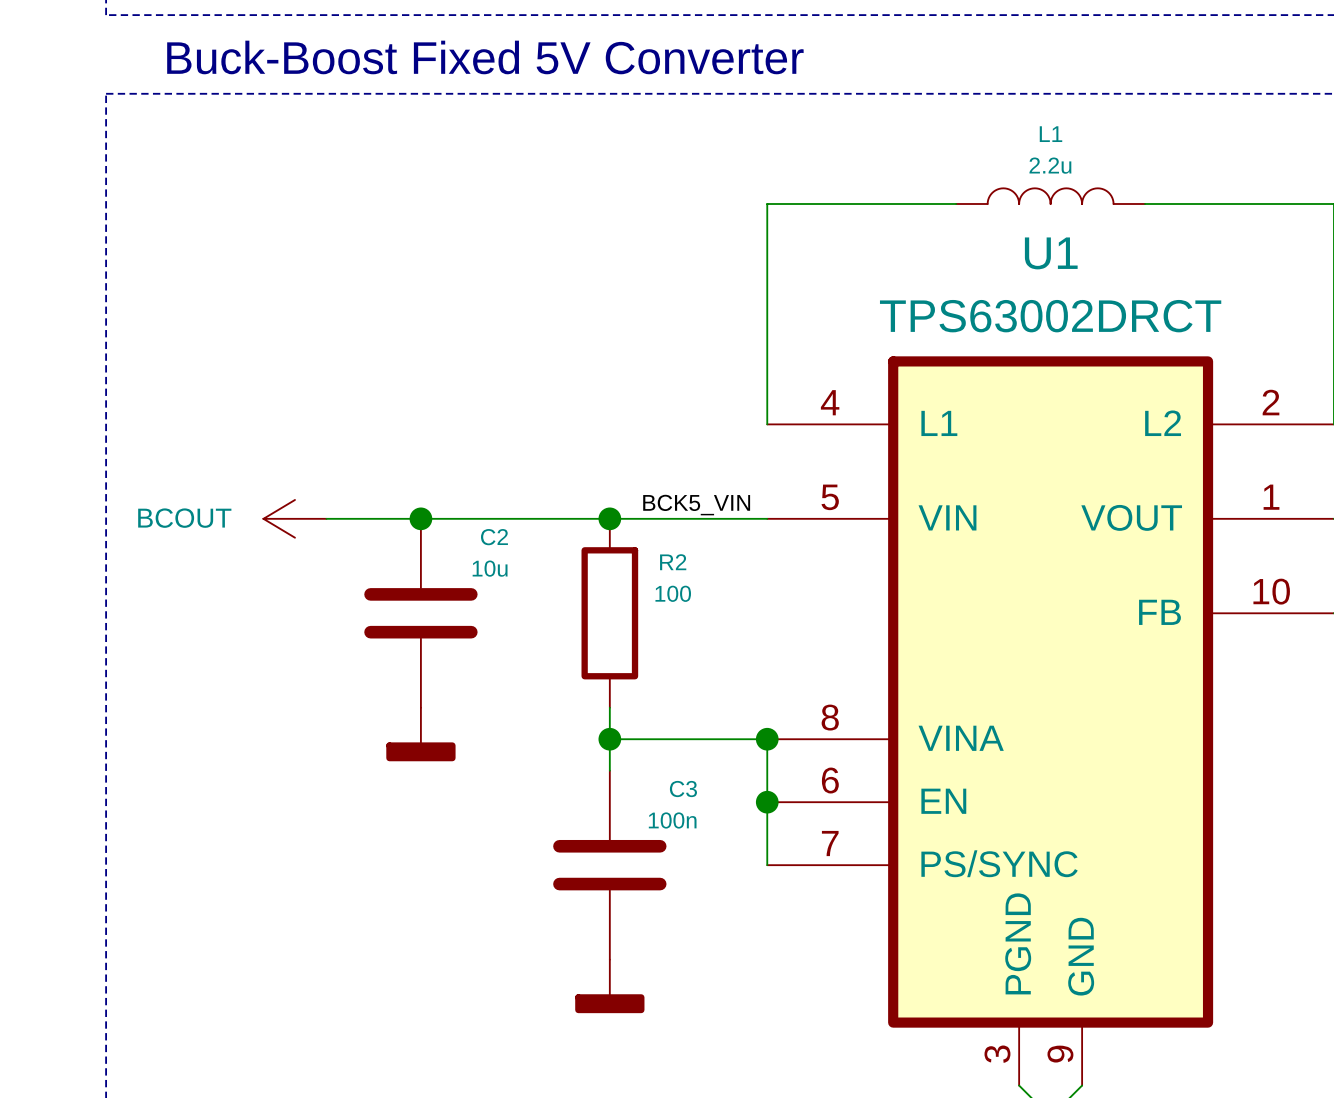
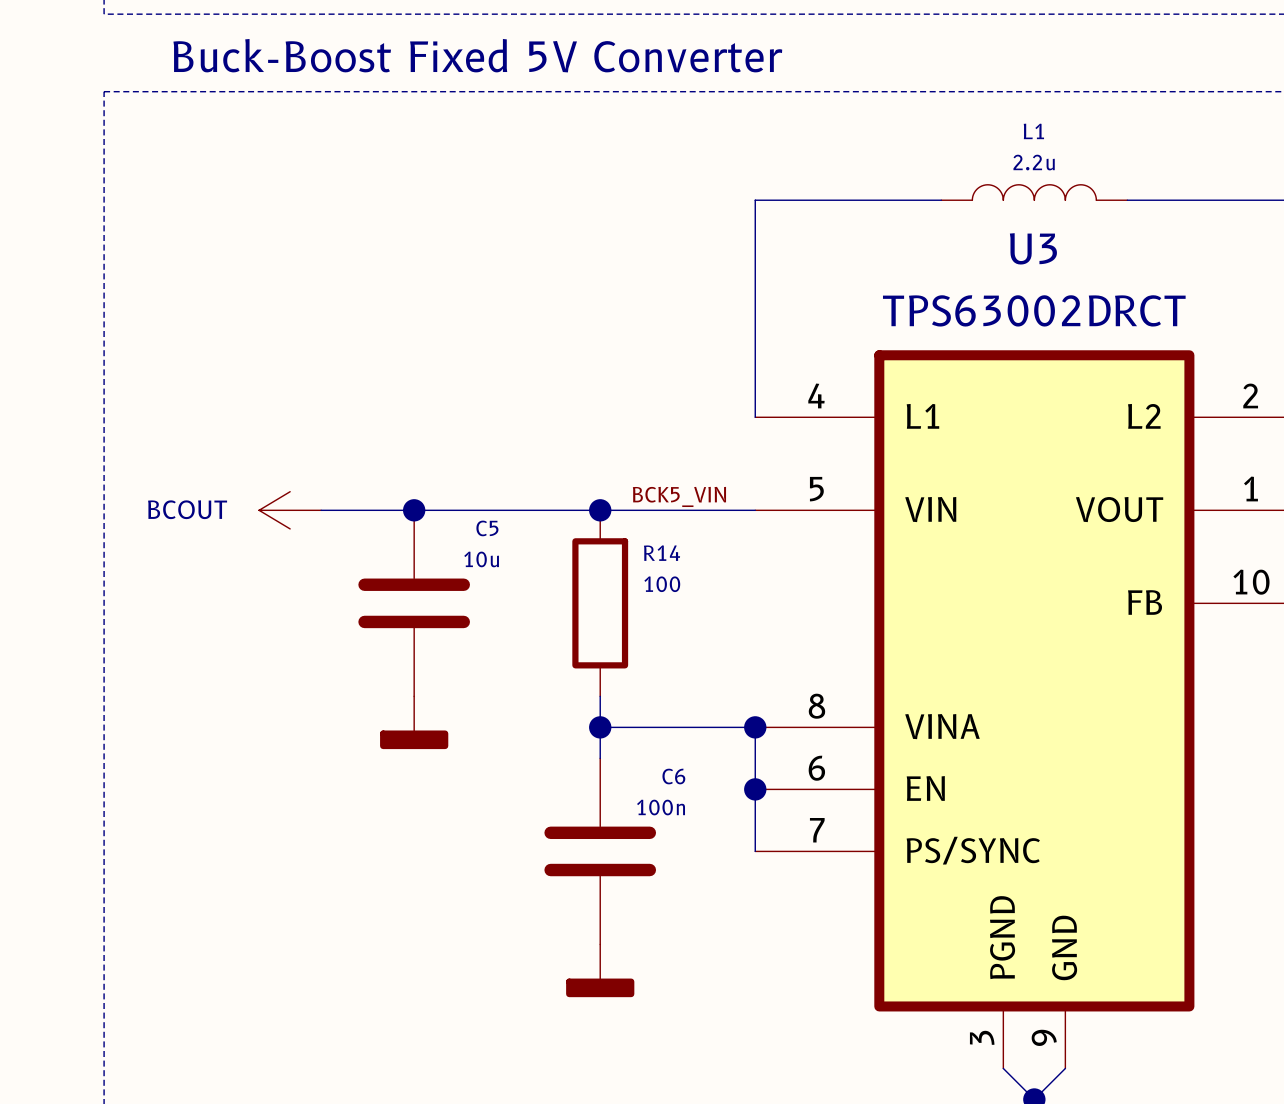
U1 name: U1 (1051, 253) -> U3 (1033, 248)
C2 name: C2 (494, 537) -> C5 (487, 528)
R2 name: R2 (673, 562) -> R14 (662, 553)
C3 name: C3 (683, 789) -> C6 (673, 776)

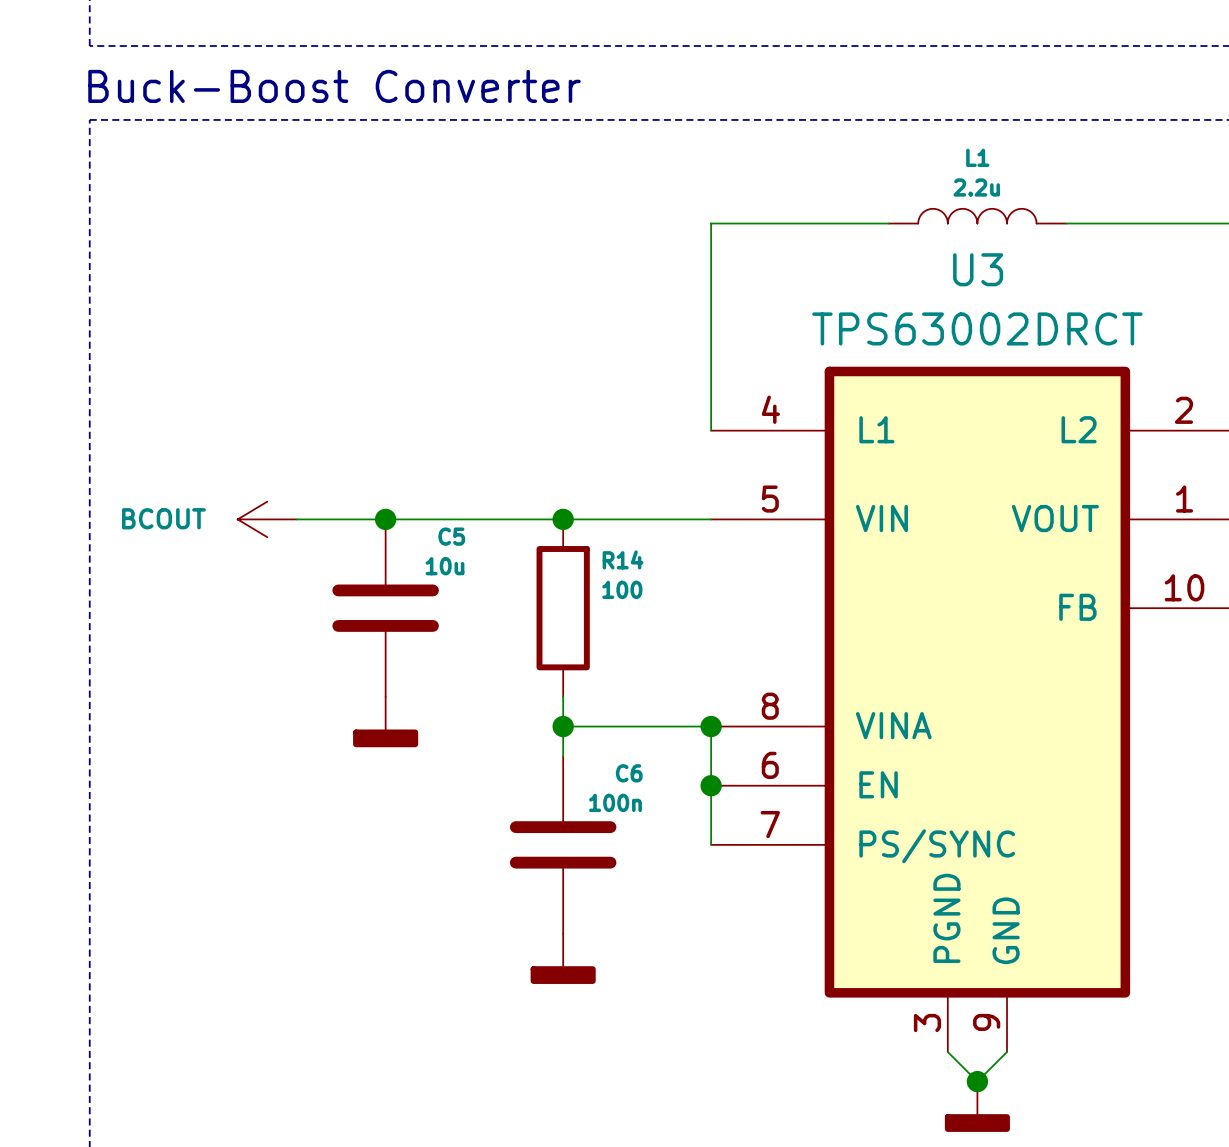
text: Buck-Boost Fixed 5V Converter (477, 55) -> Buck-Boost Converter (334, 86)
label: BCK5_VIN (679, 496) -> none

